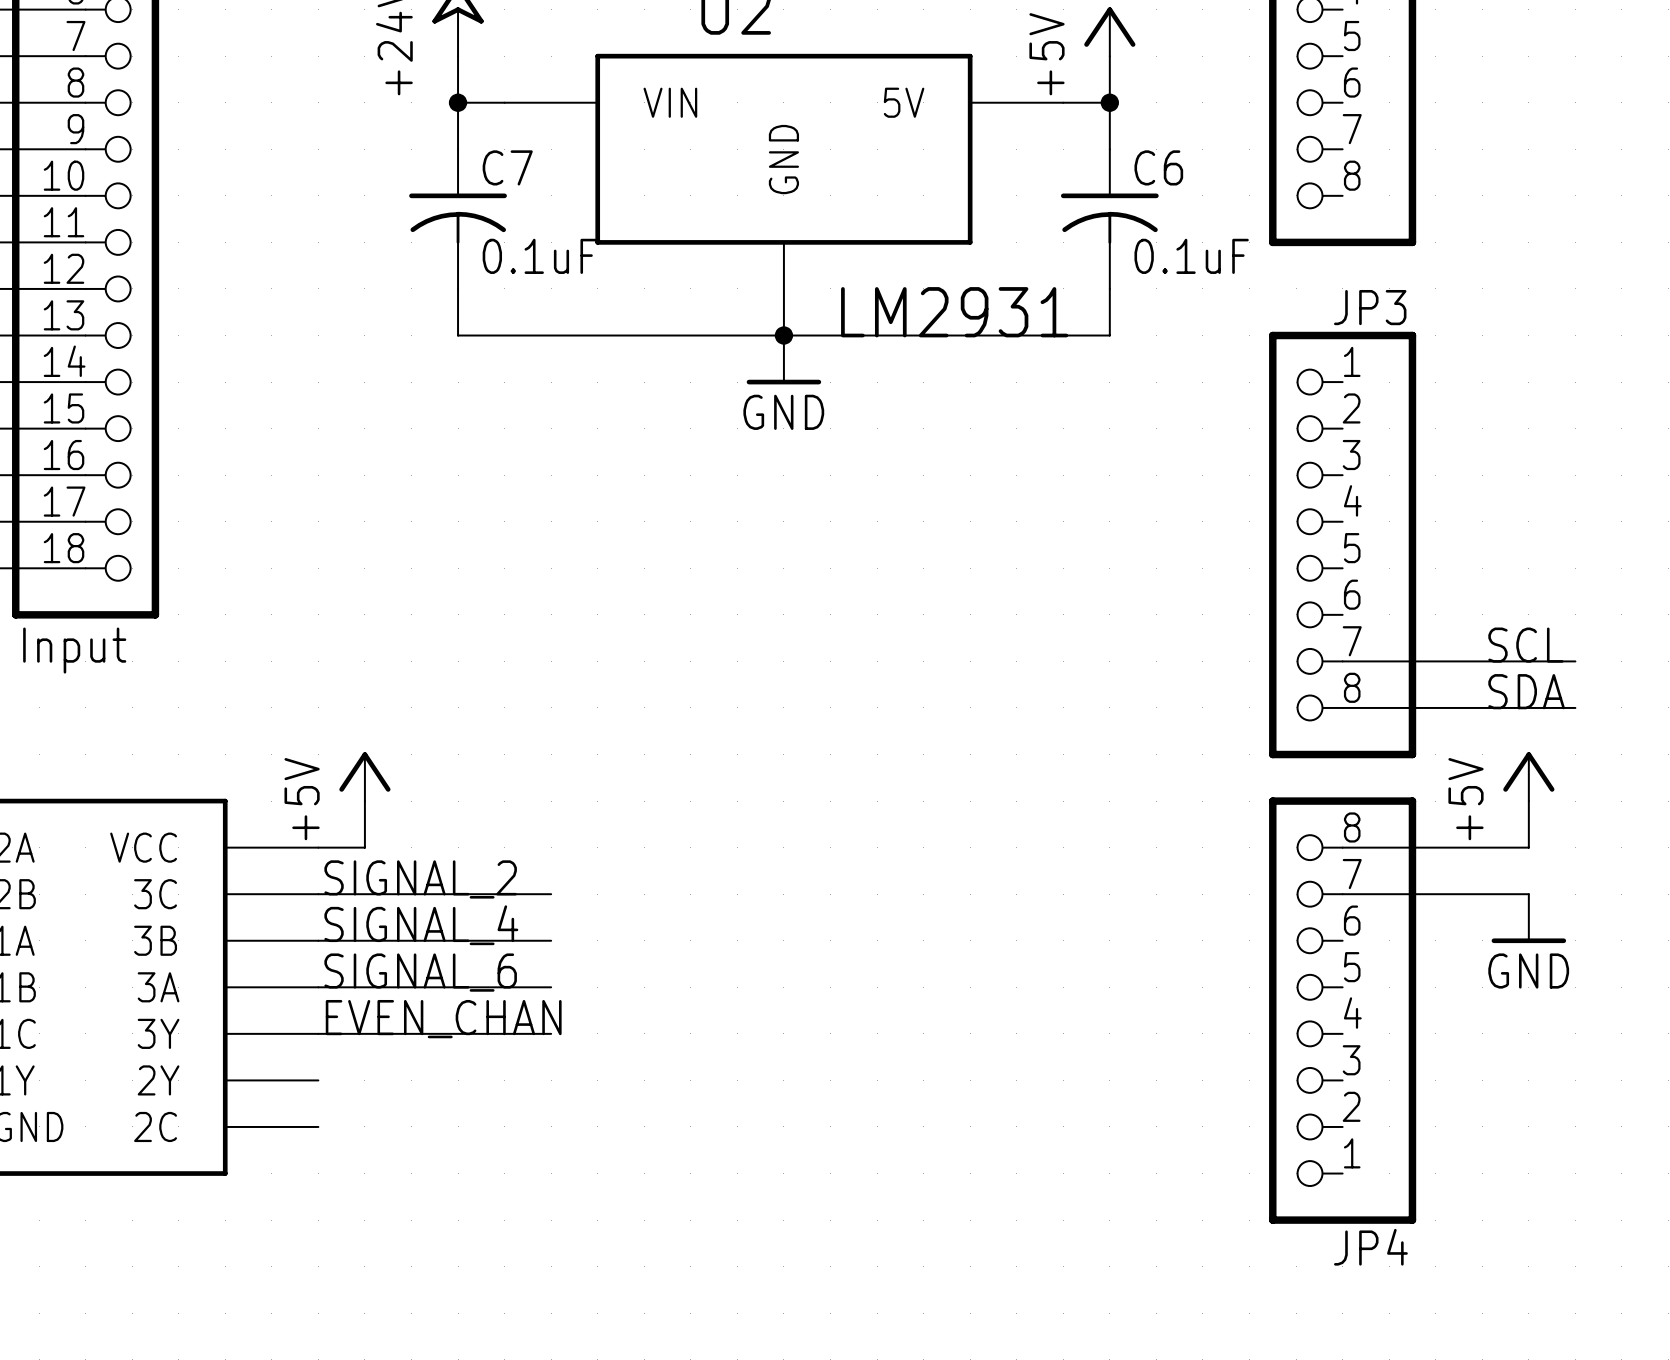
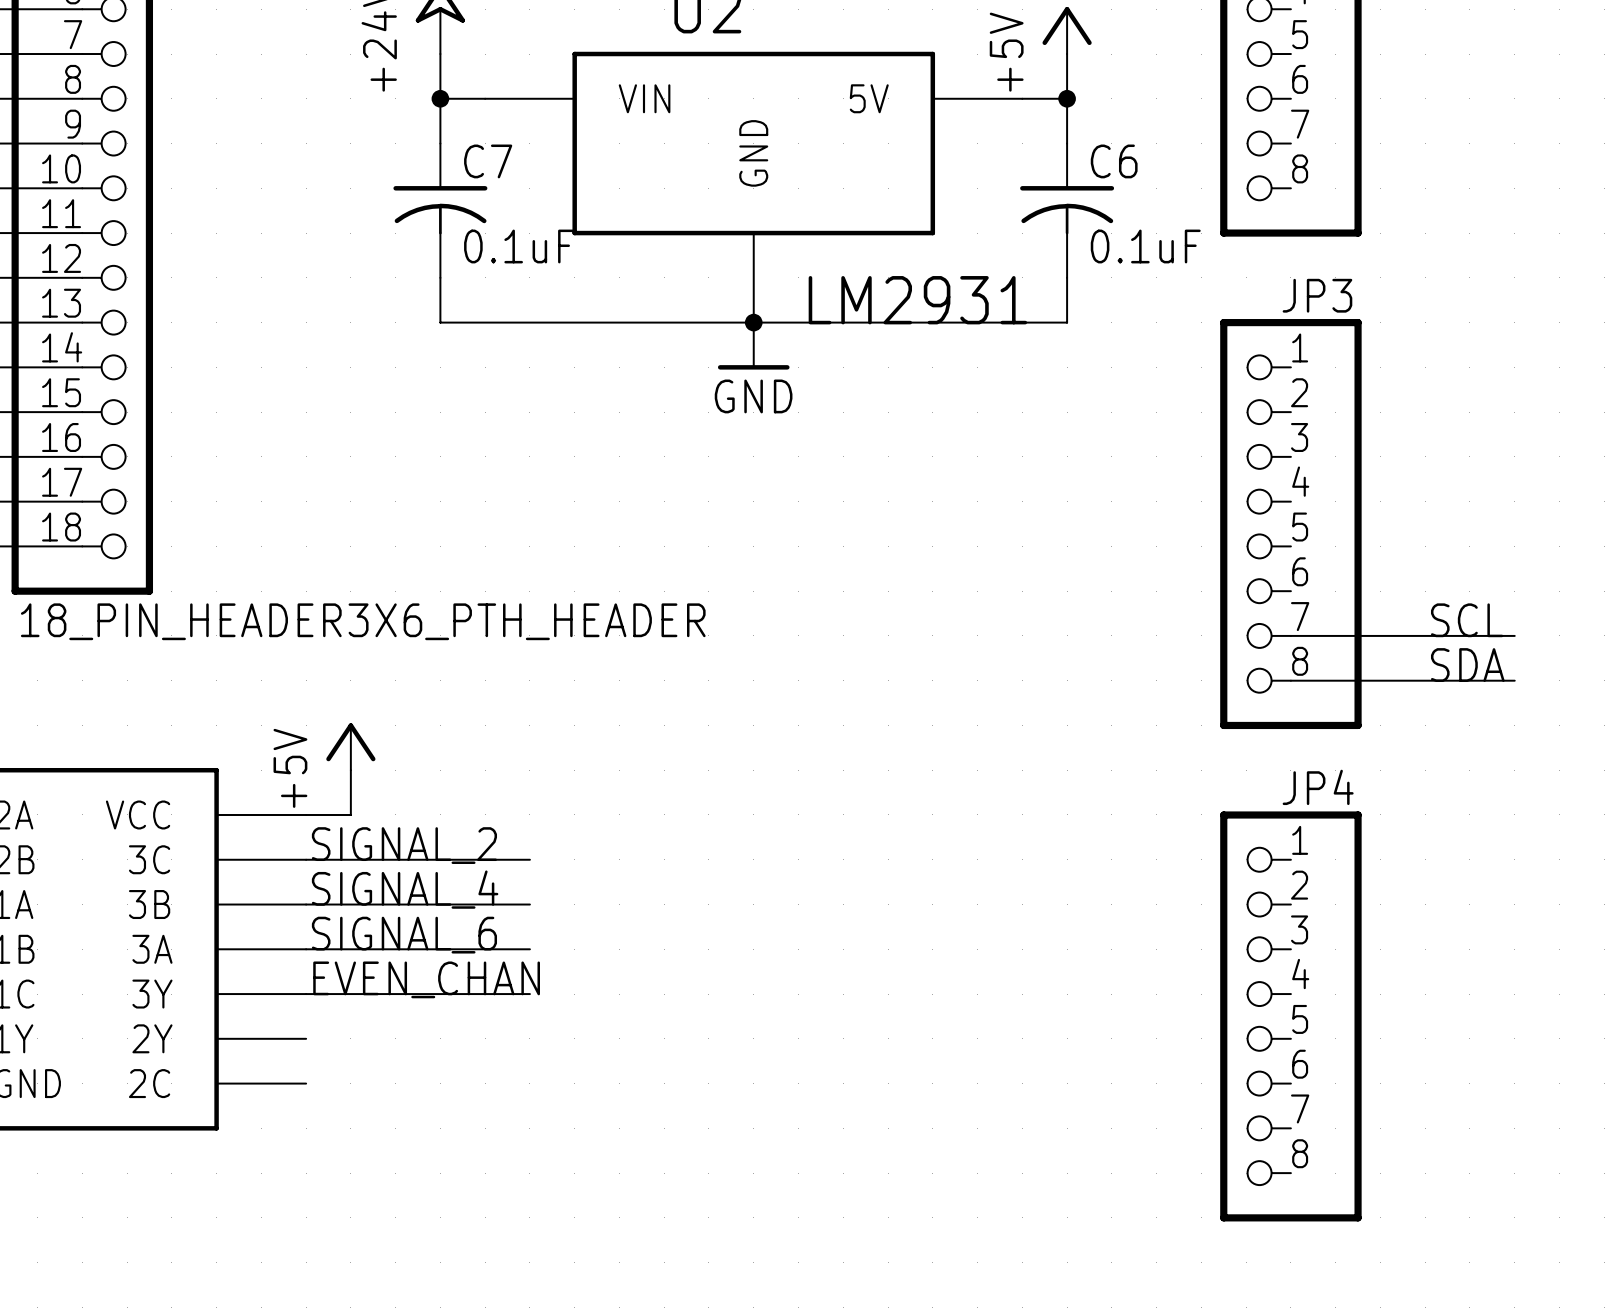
part value: Input (74, 650) -> 18_PIN_HEADER3X6_PTH_HEADER (363, 621)
power symbol: +5V (1528, 776) -> none
wire: (1528, 801) (1528, 847) (1342, 847) -> none
wire: (1342, 894) (1528, 894) -> none
power symbol: GND (1528, 918) -> none
JP4 flip: as is (1342, 1010) -> up-down (1290, 1016)

